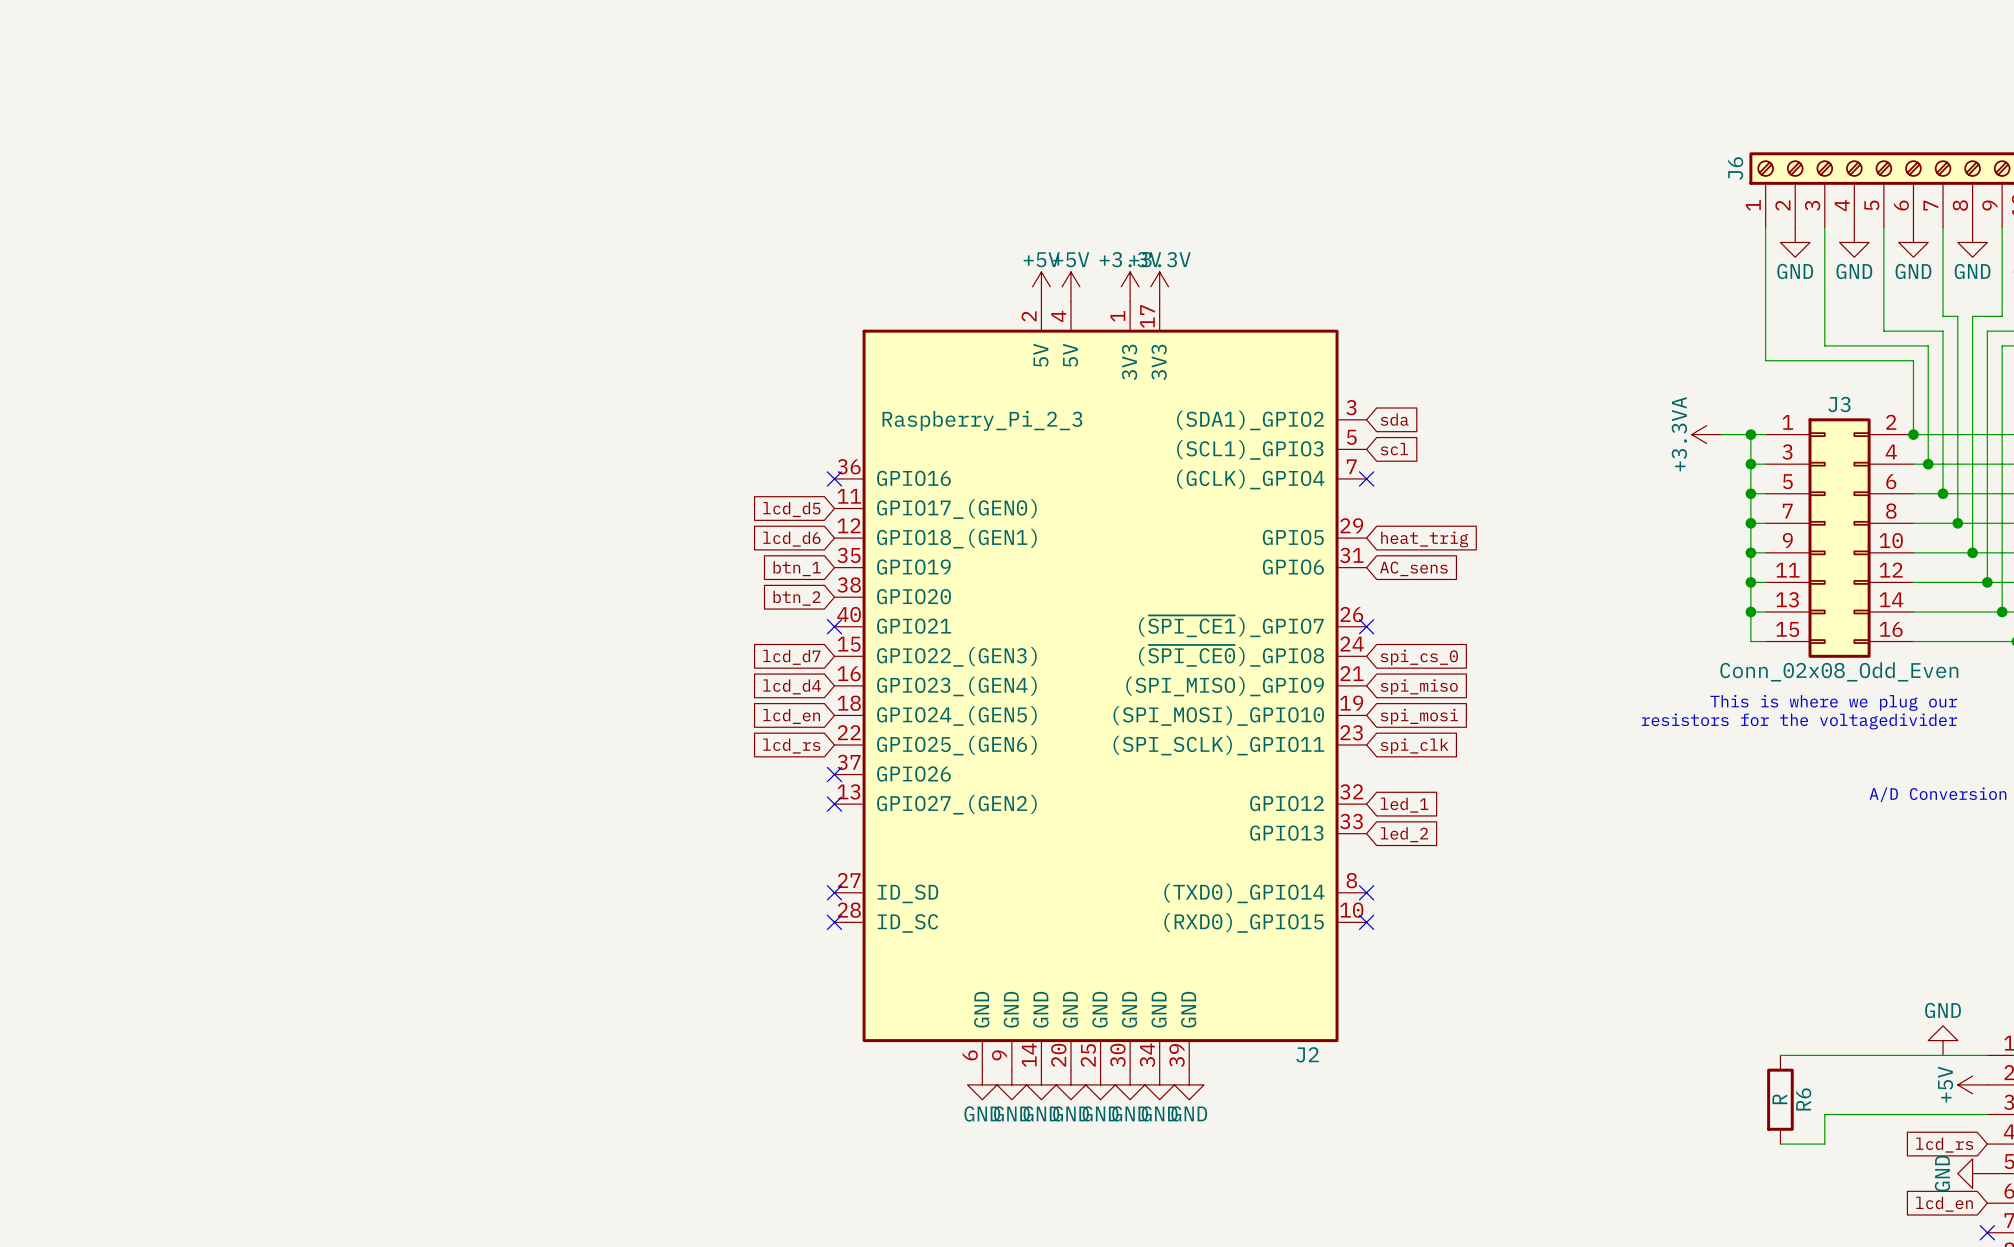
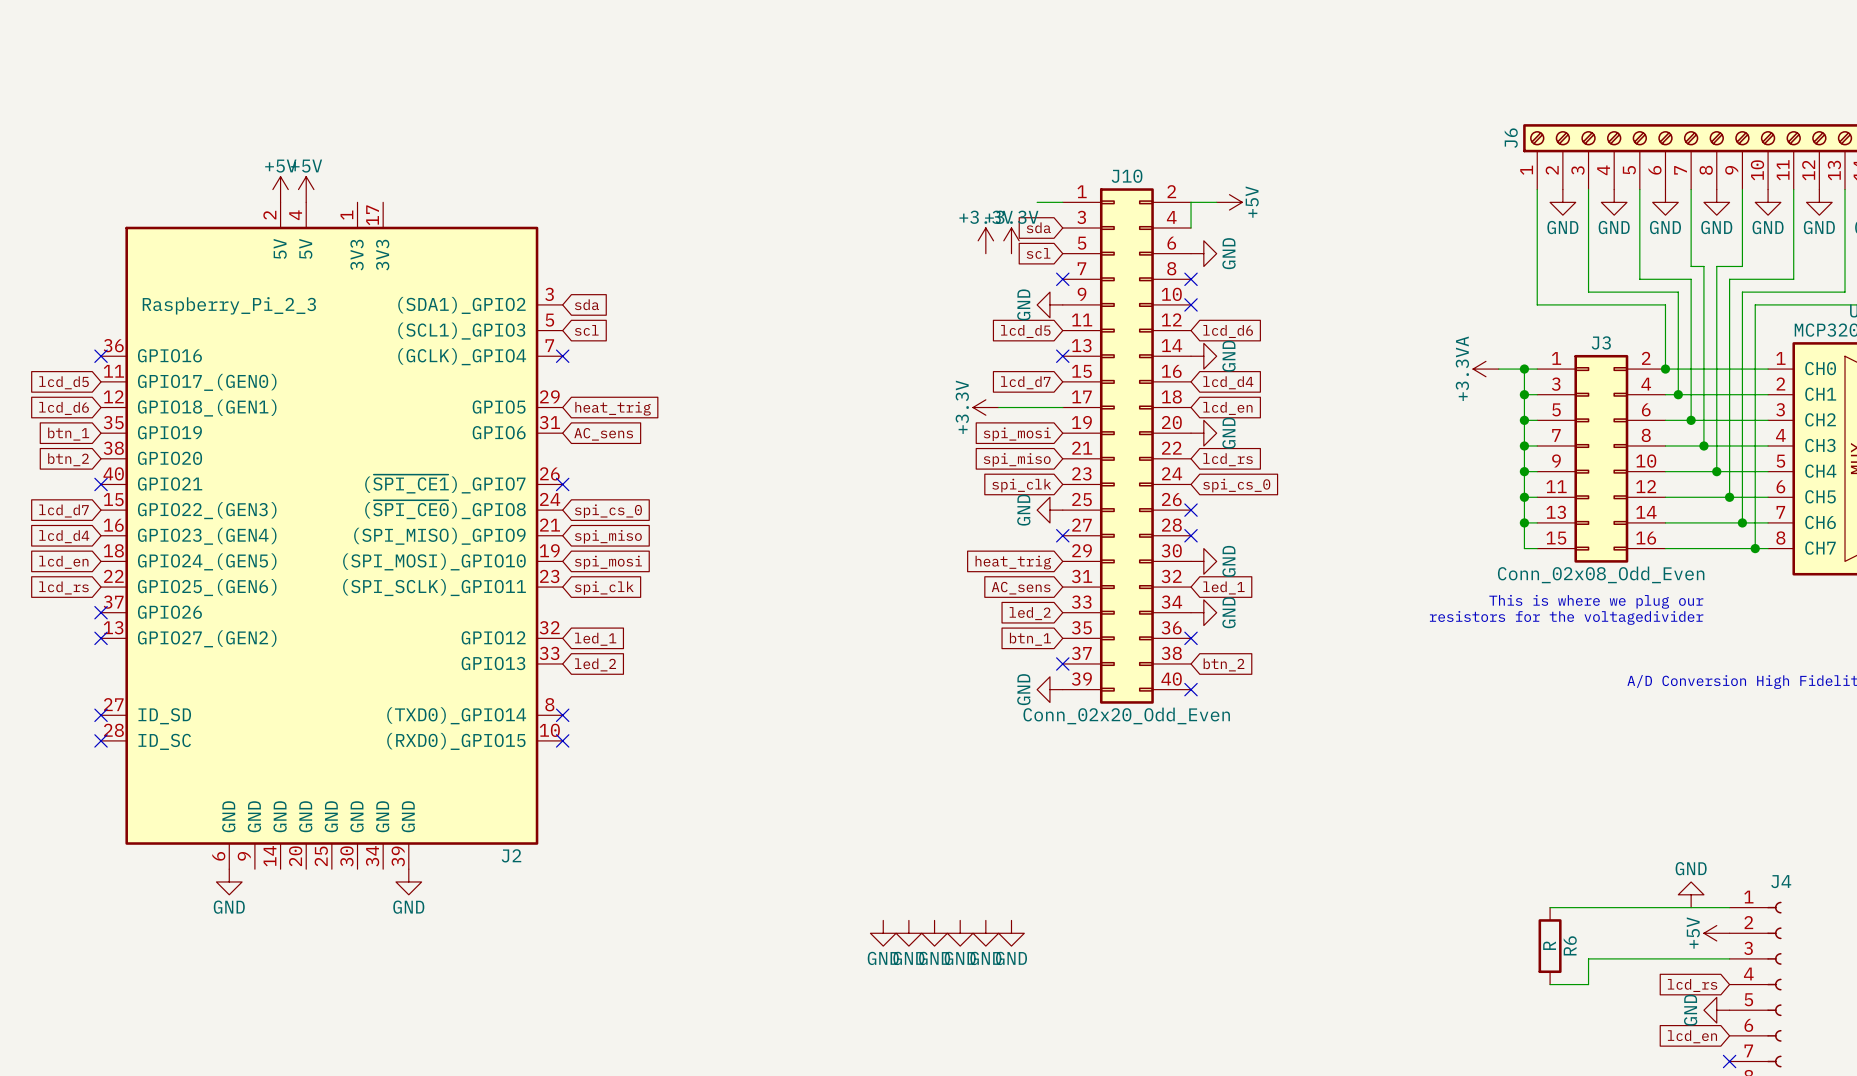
power symbol: none -> +5V (280, 189)
power symbol: none -> +5V (306, 189)
wire: none -> (1037, 202) (1062, 202)
wire: none -> (1216, 202) (1191, 202) (1191, 228)
power symbol: none -> +5V (1229, 202)
power symbol: +5V (1041, 286) -> none
power symbol: +5V (1070, 286) -> none
global label: none -> scl (1038, 253)
power symbol: none -> GND (1203, 253)
no-connect mark: none -> (1062, 279)
no-connect mark: none -> (1191, 279)
global label: none -> sda (586, 304)
power symbol: none -> GND (1049, 304)
no-connect mark: none -> (1191, 304)
global label: none -> scl (586, 330)
global label: none -> lcd_d5 (1025, 331)
global label: none -> lcd_d6 (1228, 331)
no-connect mark: none -> (101, 356)
no-connect mark: none -> (562, 356)
no-connect mark: none -> (1062, 356)
power symbol: none -> GND (1203, 356)
global label rotation: 0° (1394, 419) -> 180° (1038, 227)
global label position: sda (1394, 419) -> sda (1038, 227)
global label: scl (1394, 449) -> lcd_d4 (1228, 382)
global label: none -> lcd_d5 (64, 382)
global label: none -> lcd_d7 (1025, 382)
no-connect mark: (834, 478) -> none
power symbol: none -> +3.3V (985, 407)
no-connect mark: (1366, 478) -> none
global label: none -> lcd_d6 (64, 408)
global label: none -> heat_trig (613, 408)
global label: none -> lcd_en (1227, 408)
power symbol: none -> GND (1203, 433)
global label: none -> btn_1 (68, 434)
global label: none -> AC_sens (603, 434)
global label: lcd_d5 (791, 509) -> none
J10: none -> Conn_02x20_Odd_Even (1126, 445)
global label: none -> btn_2 (68, 459)
global label: lcd_d6 (791, 539) -> none
global label: none -> spi_miso (1017, 459)
global label: heat_trig (1424, 539) -> lcd_rs (1228, 459)
no-connect mark: none -> (101, 484)
no-connect mark: none -> (562, 484)
global label: btn_1 (797, 568) -> none
global label: AC_sens (1413, 568) -> spi_cs_0 (1236, 485)
power symbol: none -> GND (1049, 510)
no-connect mark: none -> (1191, 510)
global label: none -> lcd_d7 (64, 511)
global label: none -> spi_cs_0 (608, 511)
global label: btn_2 (797, 598) -> none
no-connect mark: (834, 626) -> none
no-connect mark: none -> (1062, 535)
global label: none -> lcd_d4 (64, 536)
global label: none -> spi_miso (608, 536)
power symbol: none -> GND (1203, 561)
global label: none -> lcd_en (63, 562)
global label: none -> spi_mosi (608, 562)
global label: lcd_d7 (791, 657) -> none
global label: none -> heat_trig (1013, 562)
global label: spi_cs_0 (1419, 657) -> none
J2 position: (1100, 685) -> (331, 535)
global label: none -> lcd_rs (64, 587)
global label: lcd_d4 (792, 686) -> none
global label: none -> spi_clk (604, 588)
global label: none -> AC_sens (1021, 588)
global label: spi_miso (1419, 687) -> led_1 (1224, 587)
no-connect mark: none -> (101, 612)
power symbol: none -> GND (1203, 612)
global label: lcd_en (791, 716) -> none
global label rotation: 0° (1419, 716) -> 180° (1017, 434)
global label position: spi_mosi (1419, 716) -> spi_mosi (1017, 434)
no-connect mark: none -> (101, 638)
no-connect mark: none -> (1191, 638)
global label: none -> led_1 (595, 639)
global label: lcd_rs (791, 746) -> none
global label: none -> btn_1 (1030, 639)
global label rotation: 0° (1414, 746) -> 180° (1021, 485)
global label position: spi_clk (1414, 746) -> spi_clk (1021, 485)
no-connect mark: (834, 774) -> none
no-connect mark: none -> (1062, 663)
global label: none -> led_2 (595, 664)
global label: none -> btn_2 (1223, 664)
no-connect mark: (834, 804) -> none
power symbol: none -> GND (1049, 689)
no-connect mark: none -> (1191, 689)
global label: led_1 (1404, 805) -> none
no-connect mark: none -> (101, 715)
no-connect mark: none -> (562, 715)
global label rotation: 0° (1404, 834) -> 180° (1030, 613)
global label position: led_2 (1404, 834) -> led_2 (1030, 613)
no-connect mark: none -> (101, 740)
no-connect mark: none -> (562, 740)
no-connect mark: (834, 892) -> none
no-connect mark: (1366, 892) -> none
no-connect mark: (834, 922) -> none
no-connect mark: (1366, 922) -> none
power symbol: none -> GND (229, 881)
power symbol: none -> GND (408, 881)
power symbol: GND (982, 1084) -> none
power symbol: GND (1189, 1084) -> none

